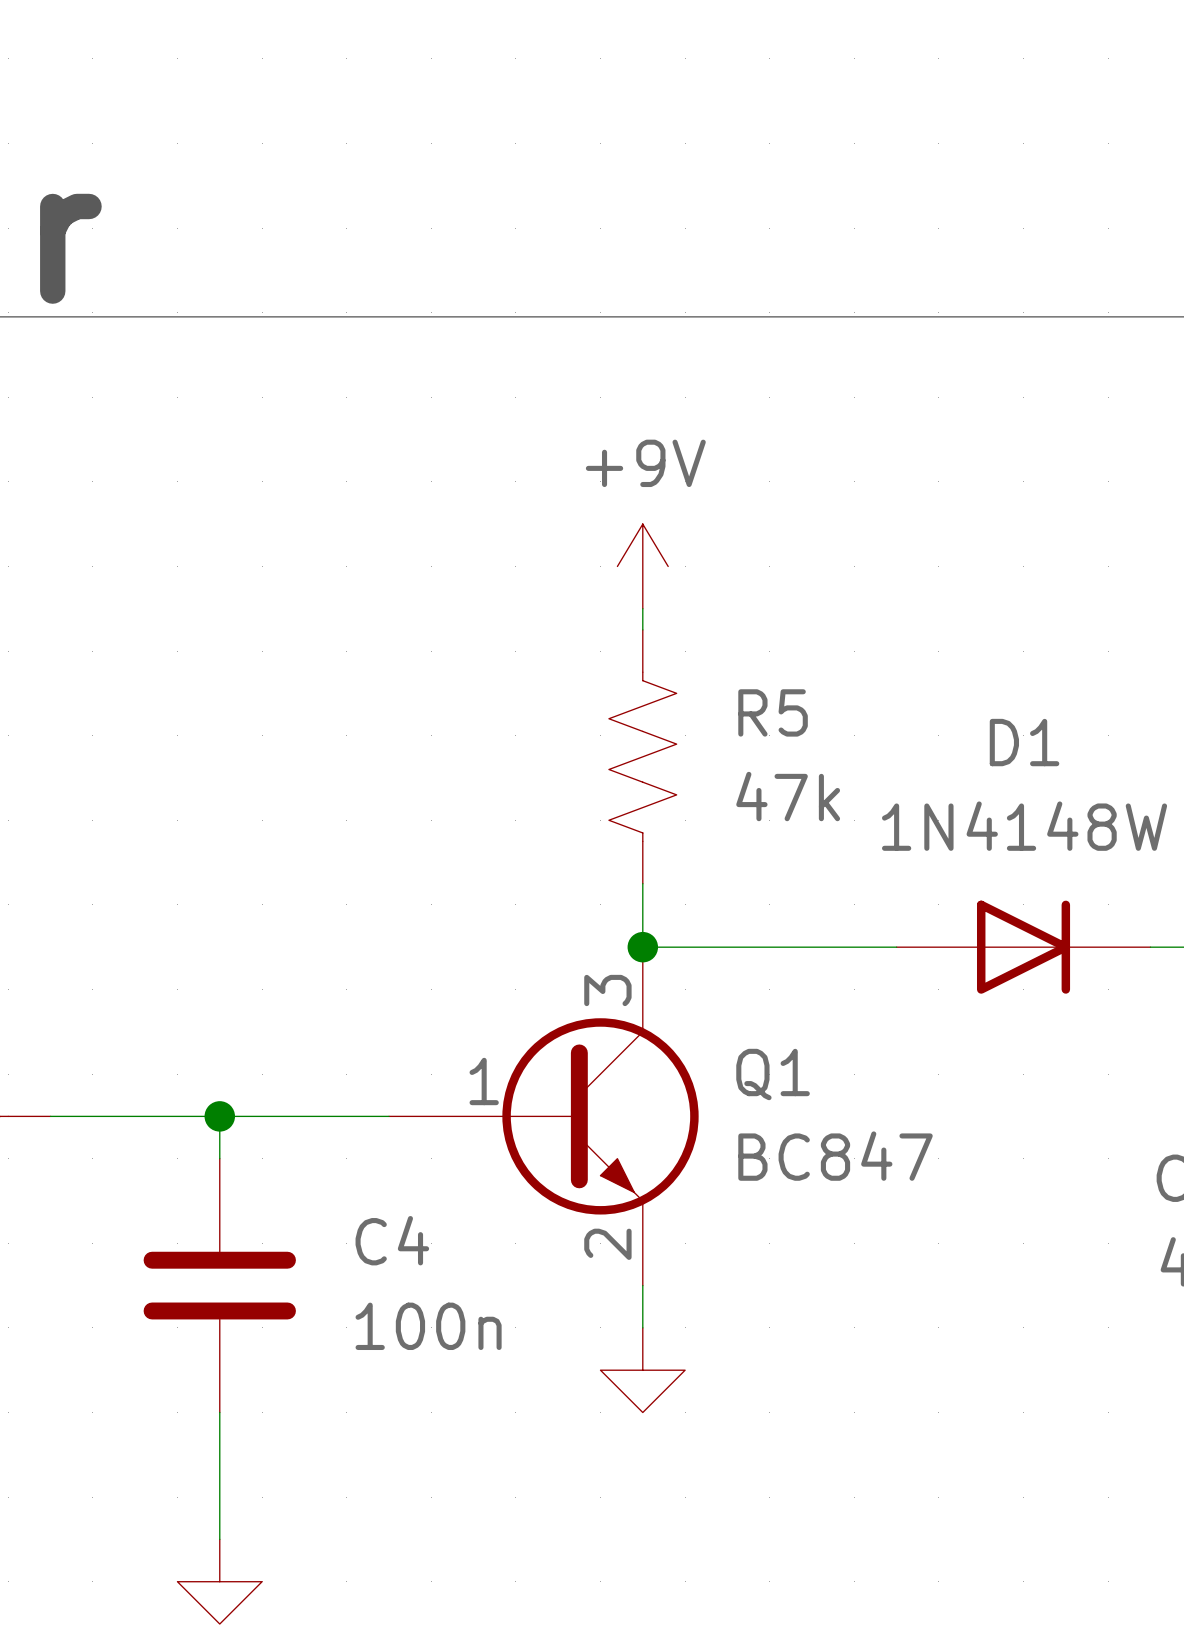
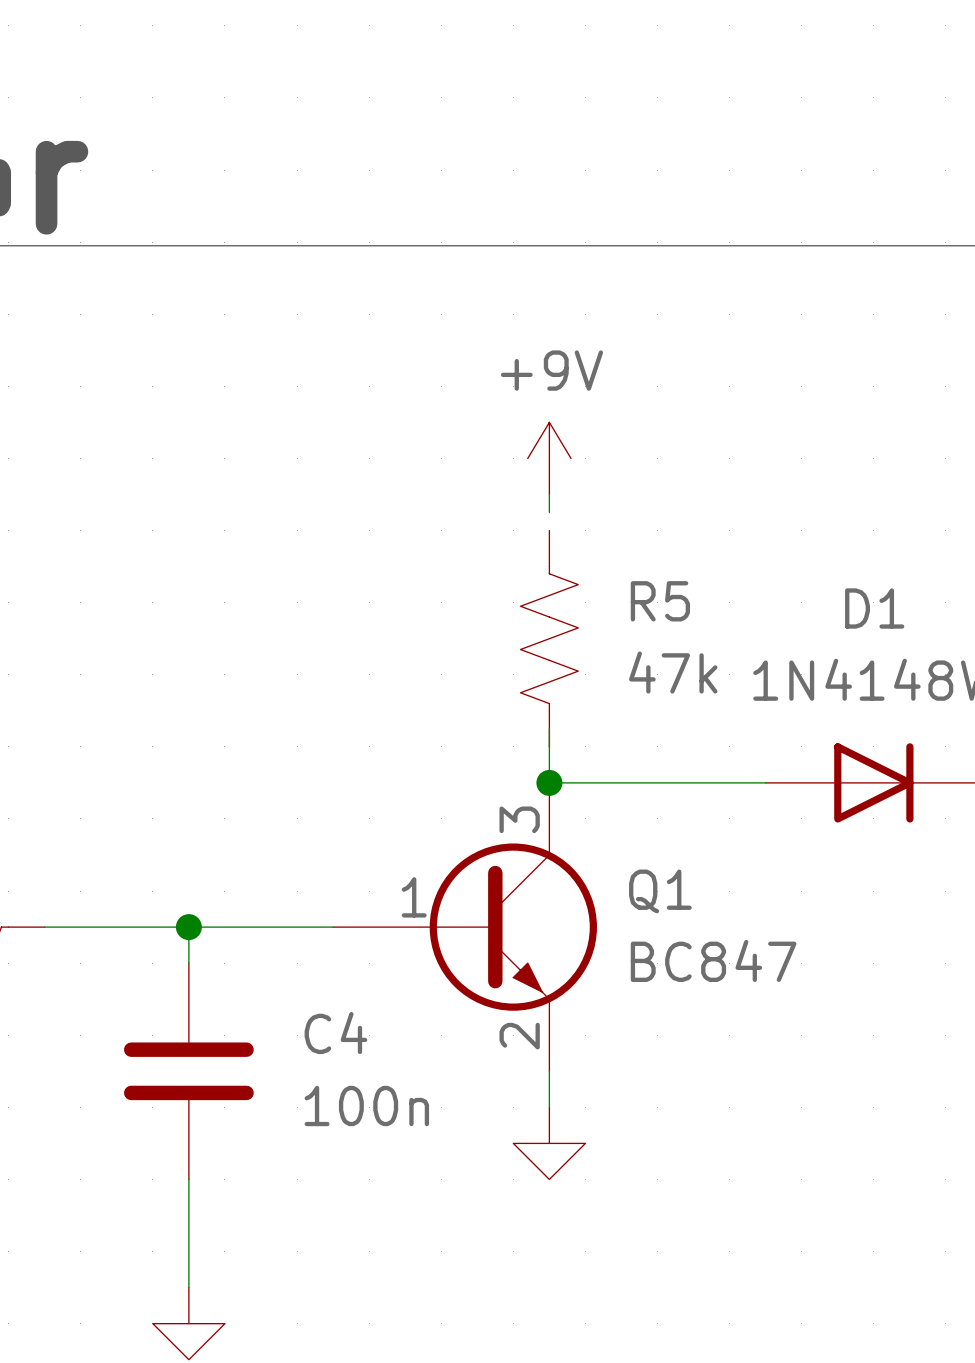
R5 position: (642, 756) -> (549, 638)

